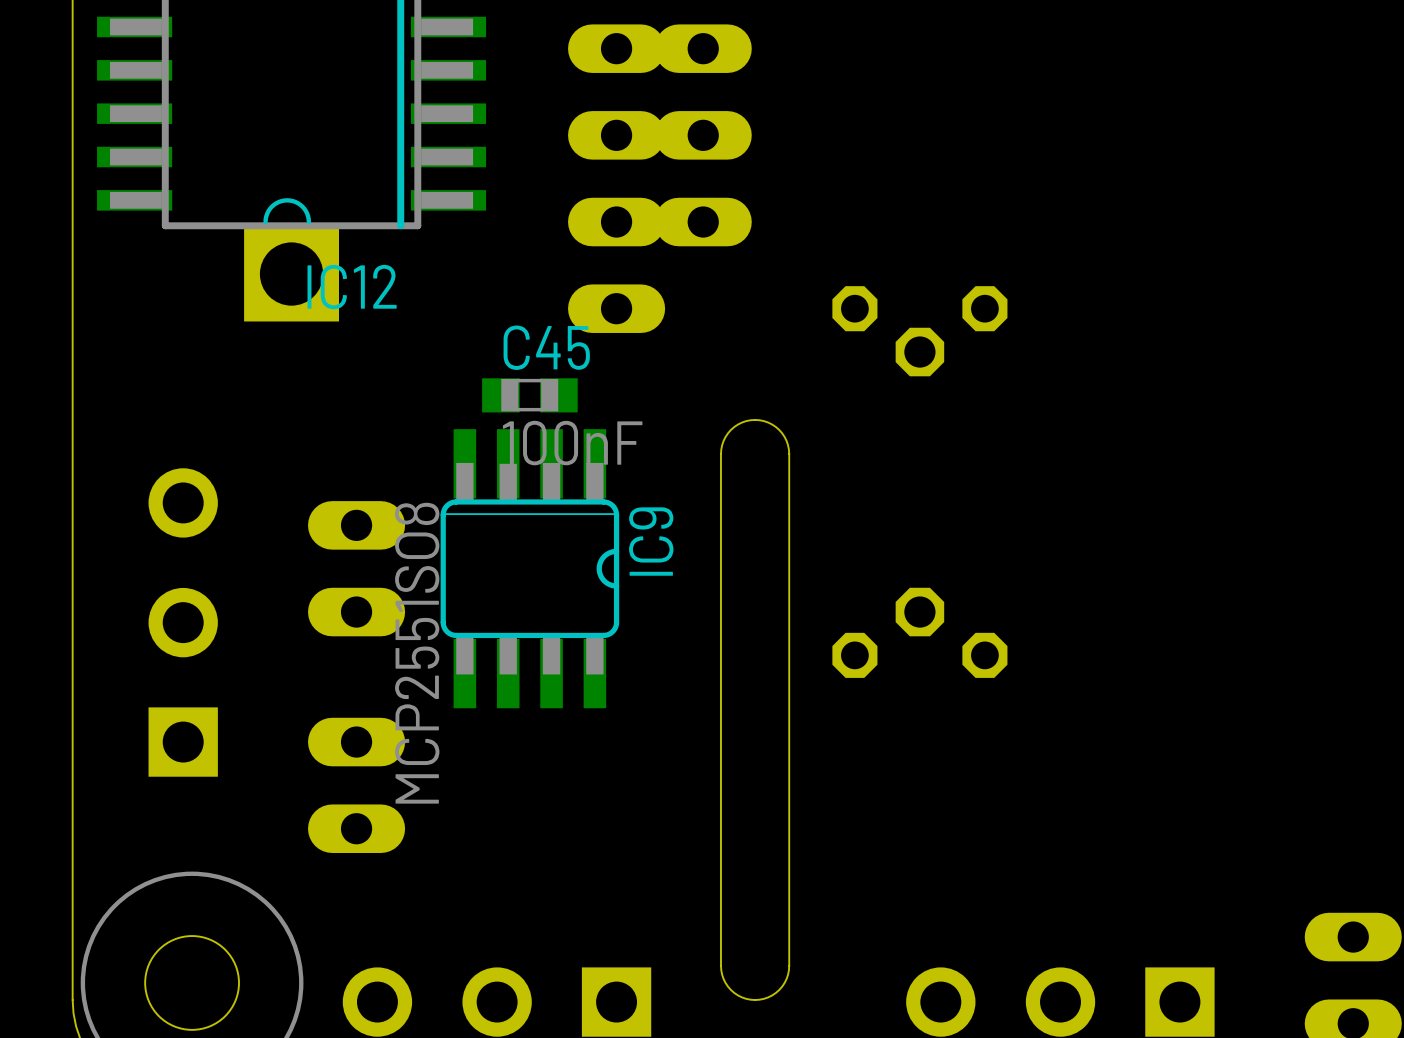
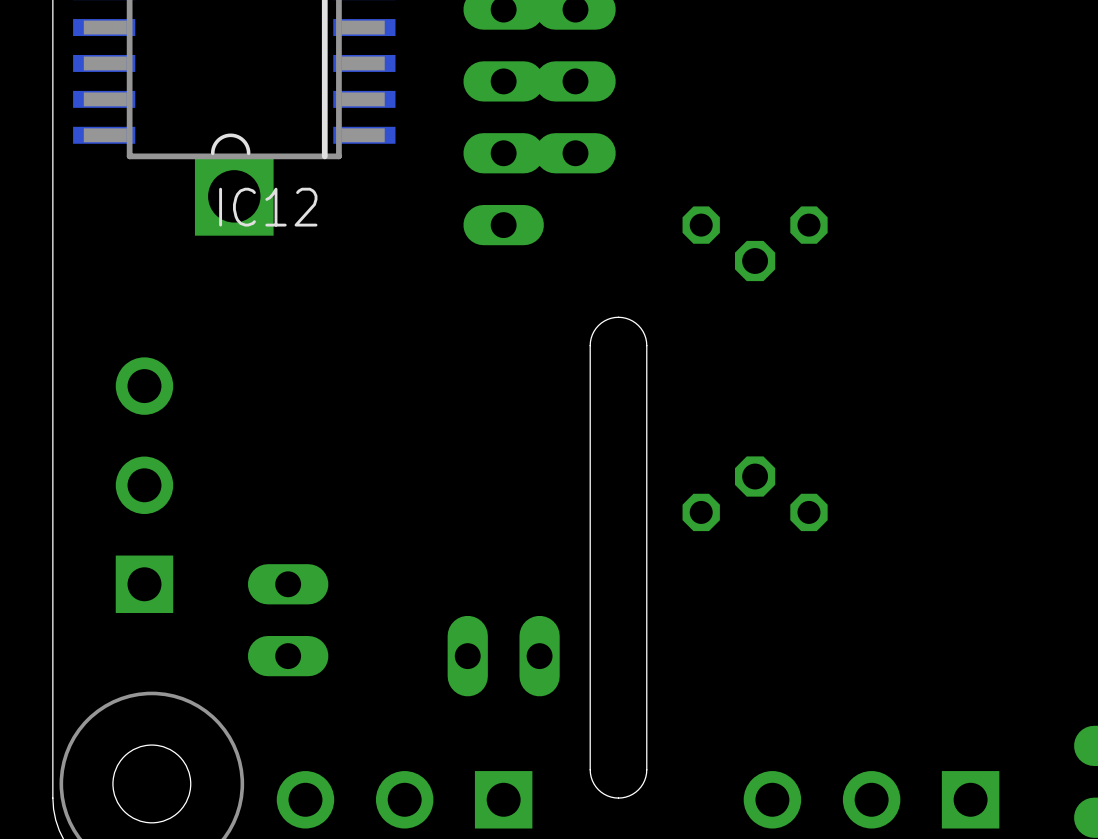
C45: 100nF (529, 395) -> none
part rotation: 0° (356, 568) -> 90° clockwise (503, 656)
part position: (356, 568) -> (503, 656)
IC9: MCP2551SO8 (529, 568) -> none

